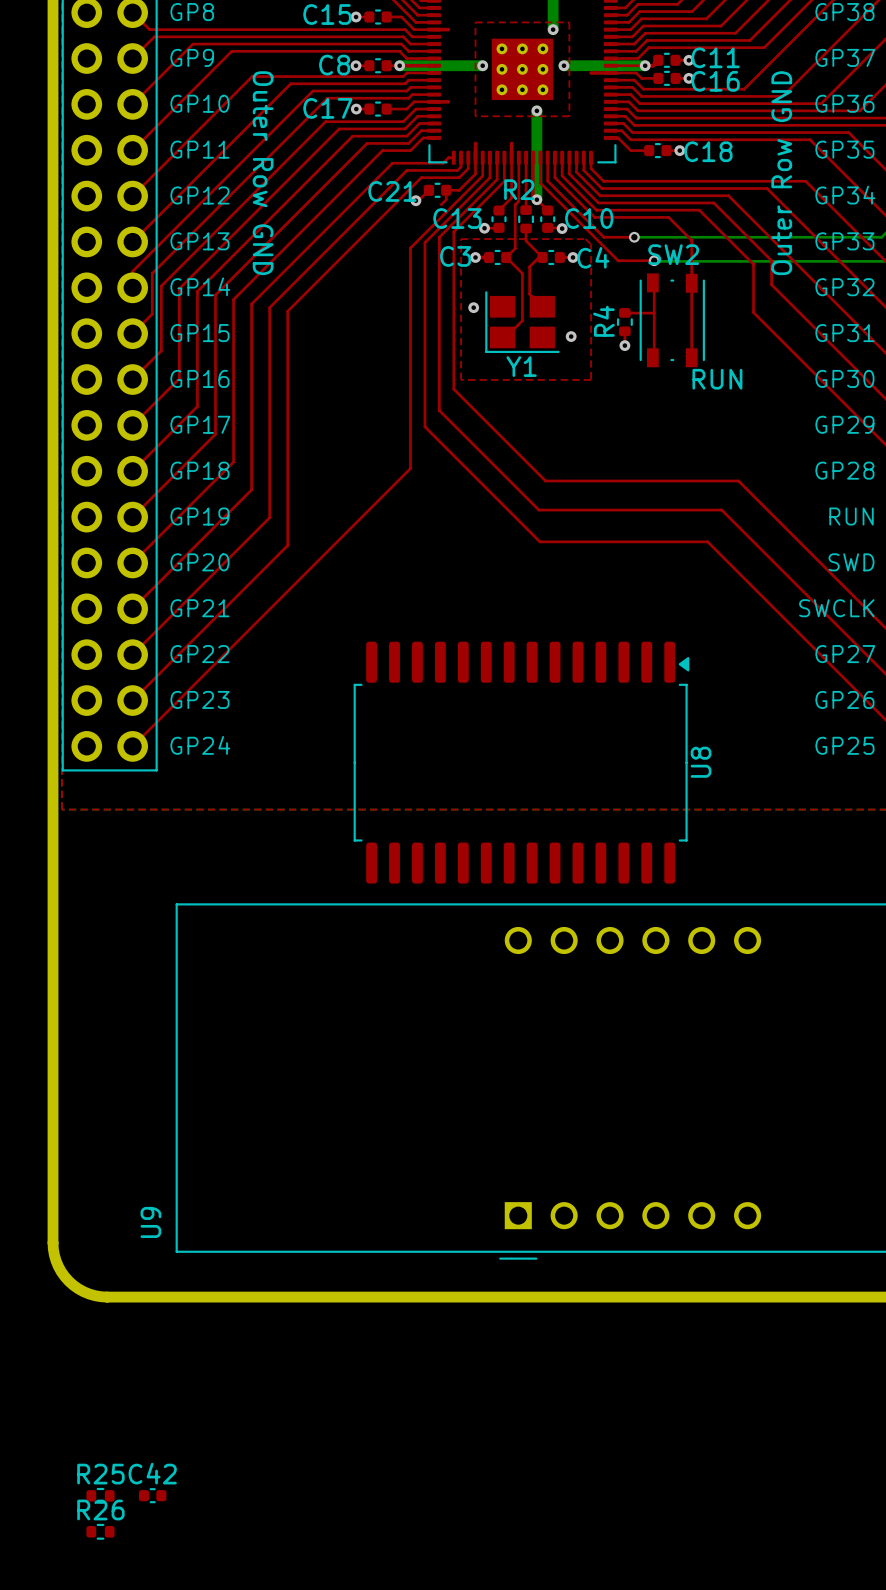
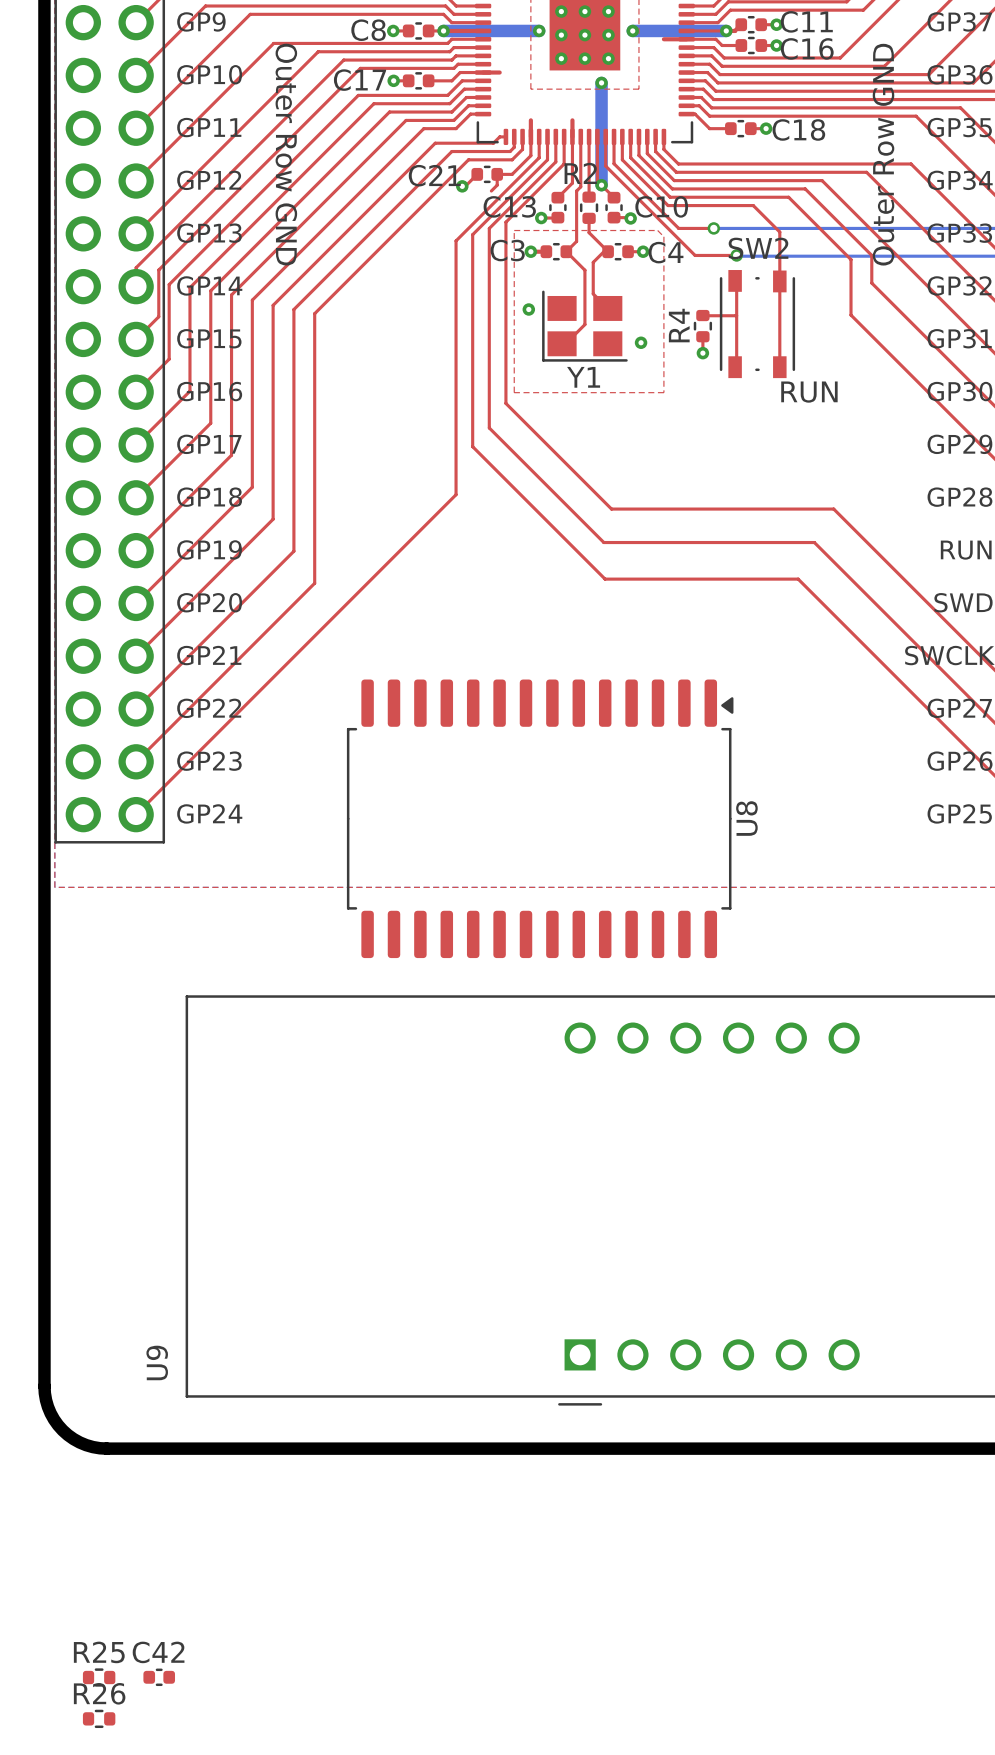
U8 position: (521, 762) -> (540, 818)

